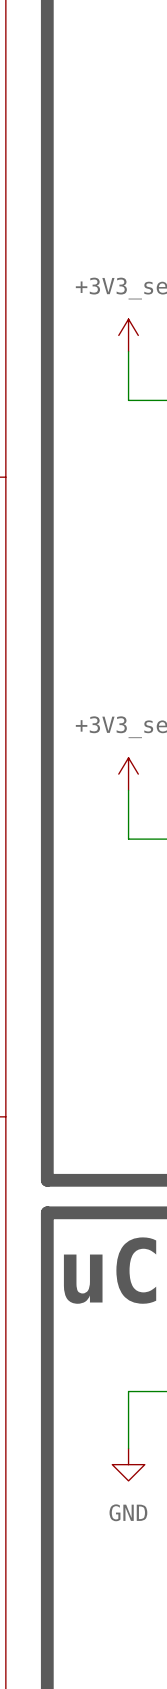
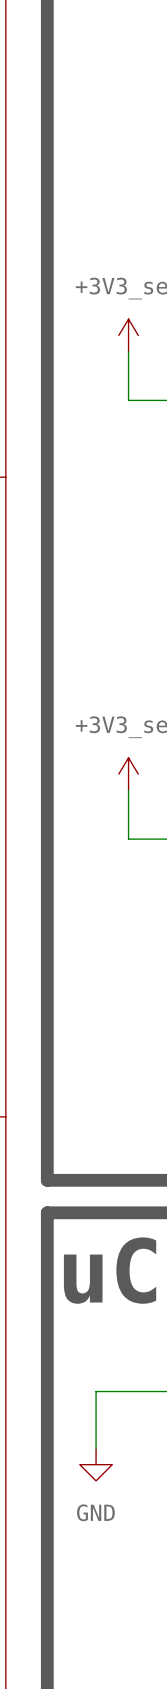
wire: (128, 1391) (128, 1448) -> (128, 1391) (96, 1391) (96, 1448)
power symbol position: GND (128, 1464) -> GND (96, 1464)

